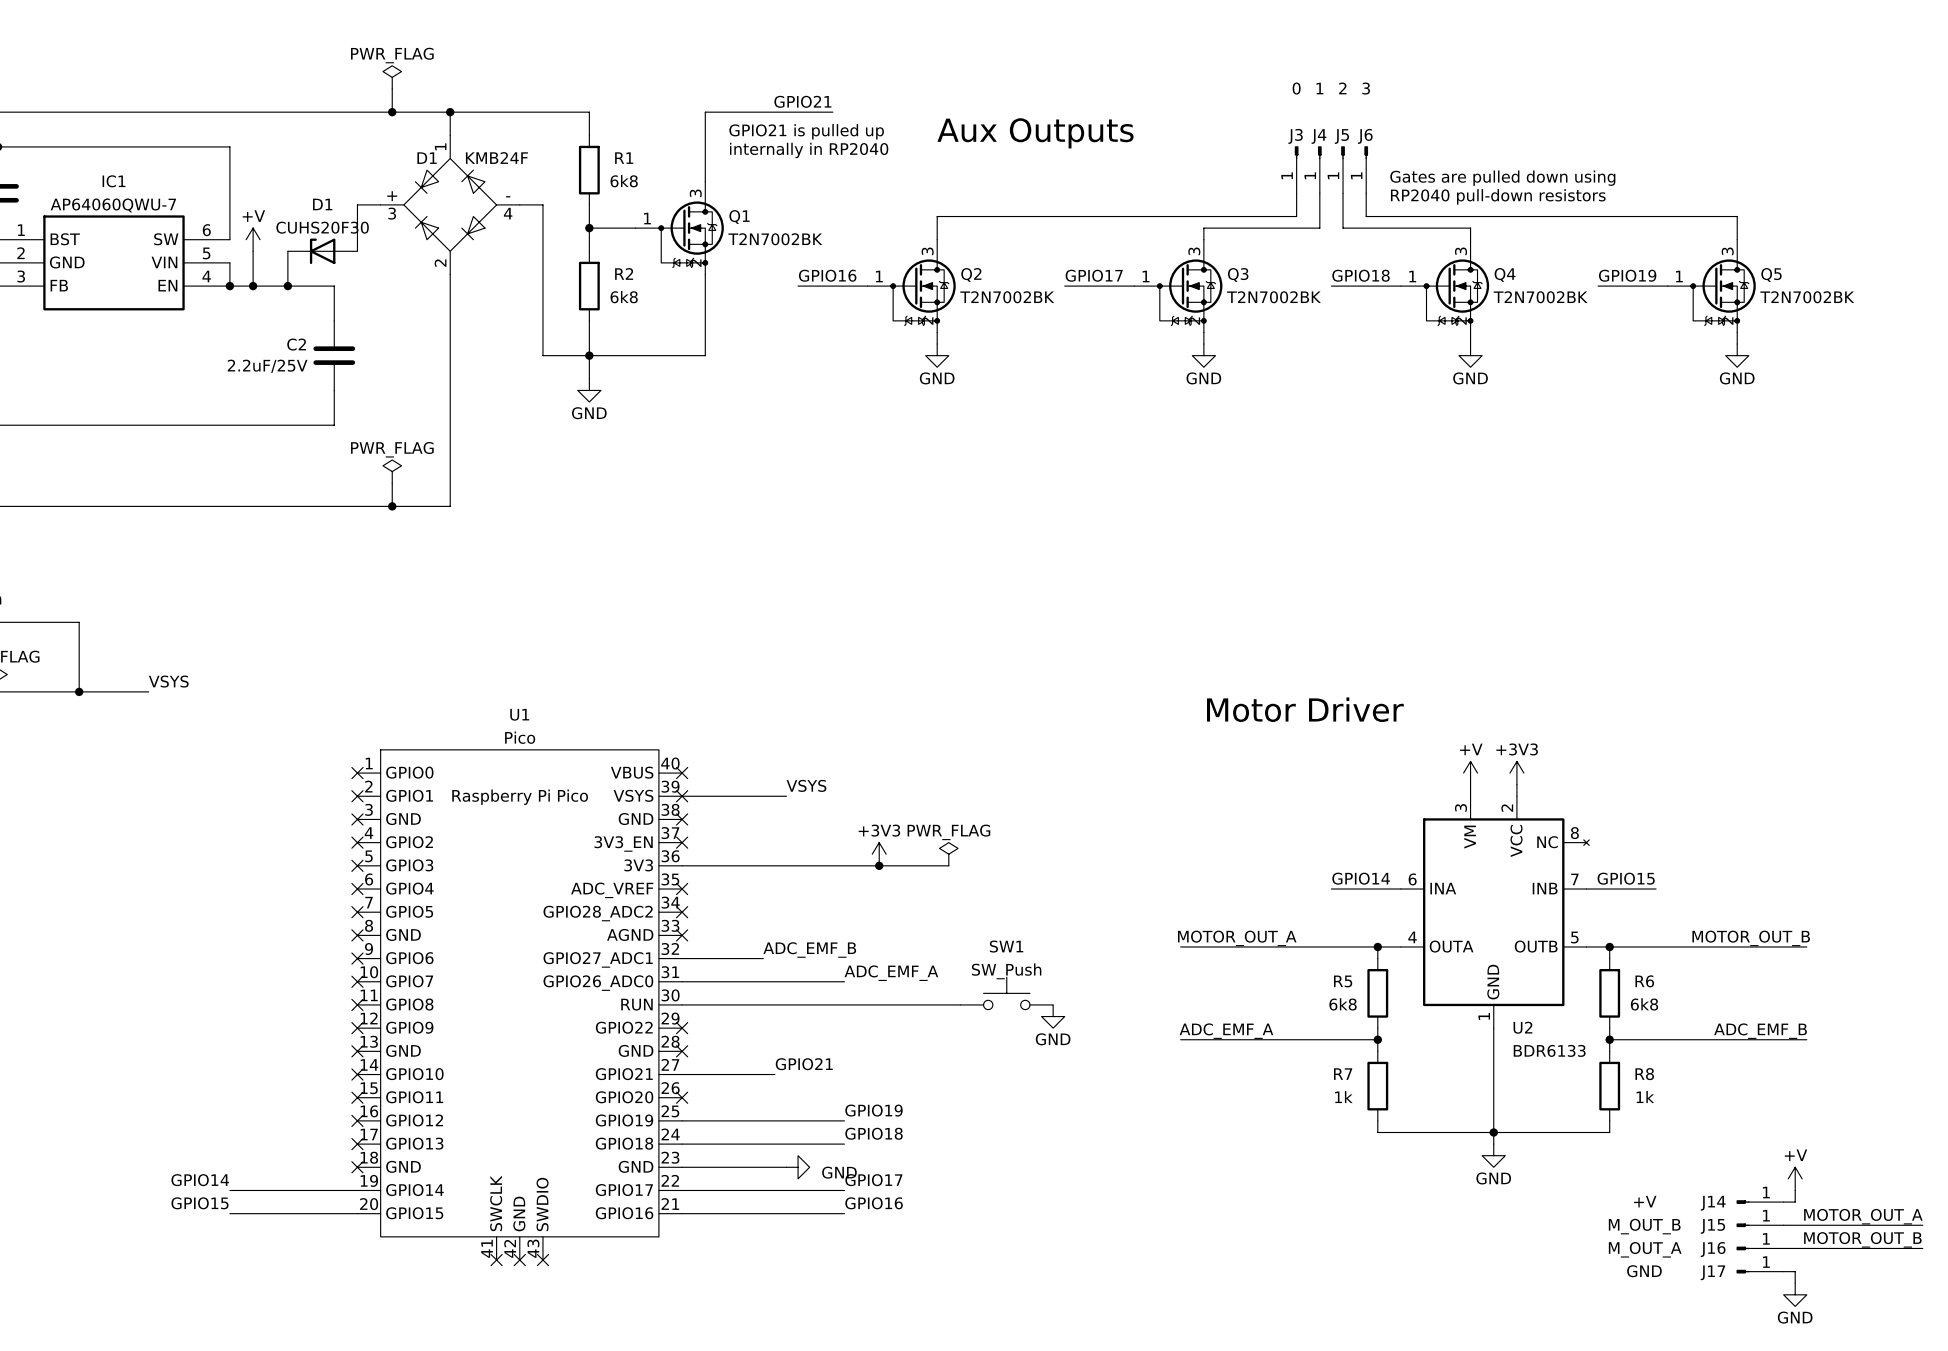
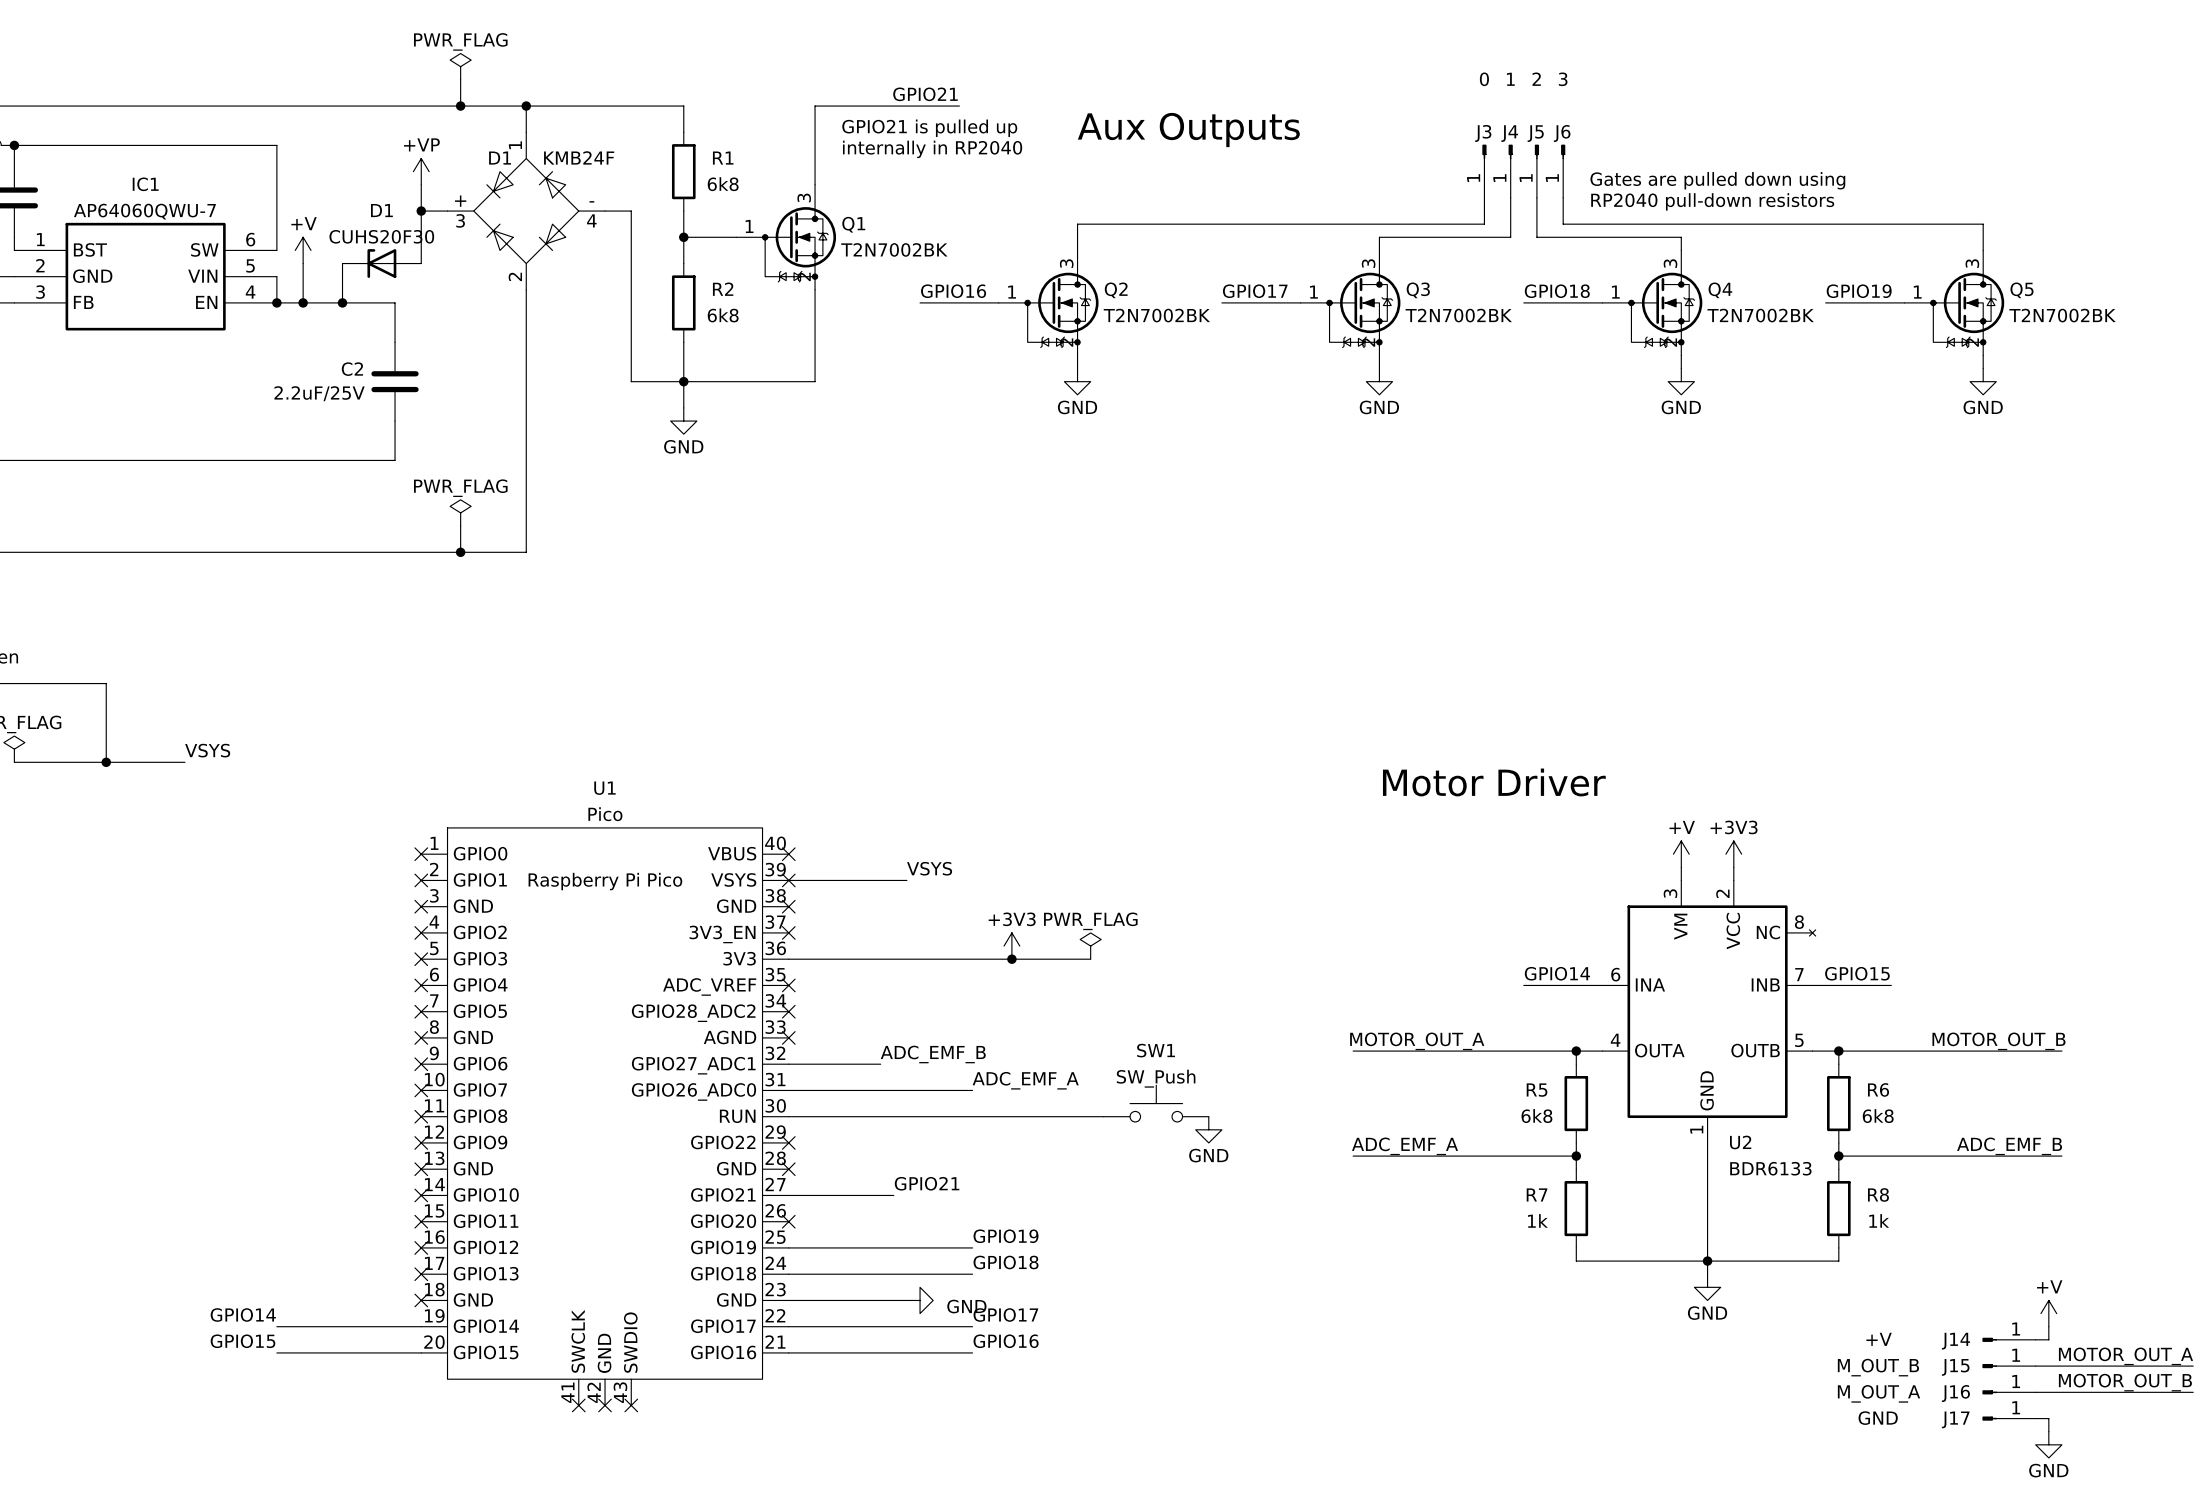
power symbol: none -> +VP (421, 171)
wire: none -> (421, 184) (421, 211)
junction: none -> (421, 211)

